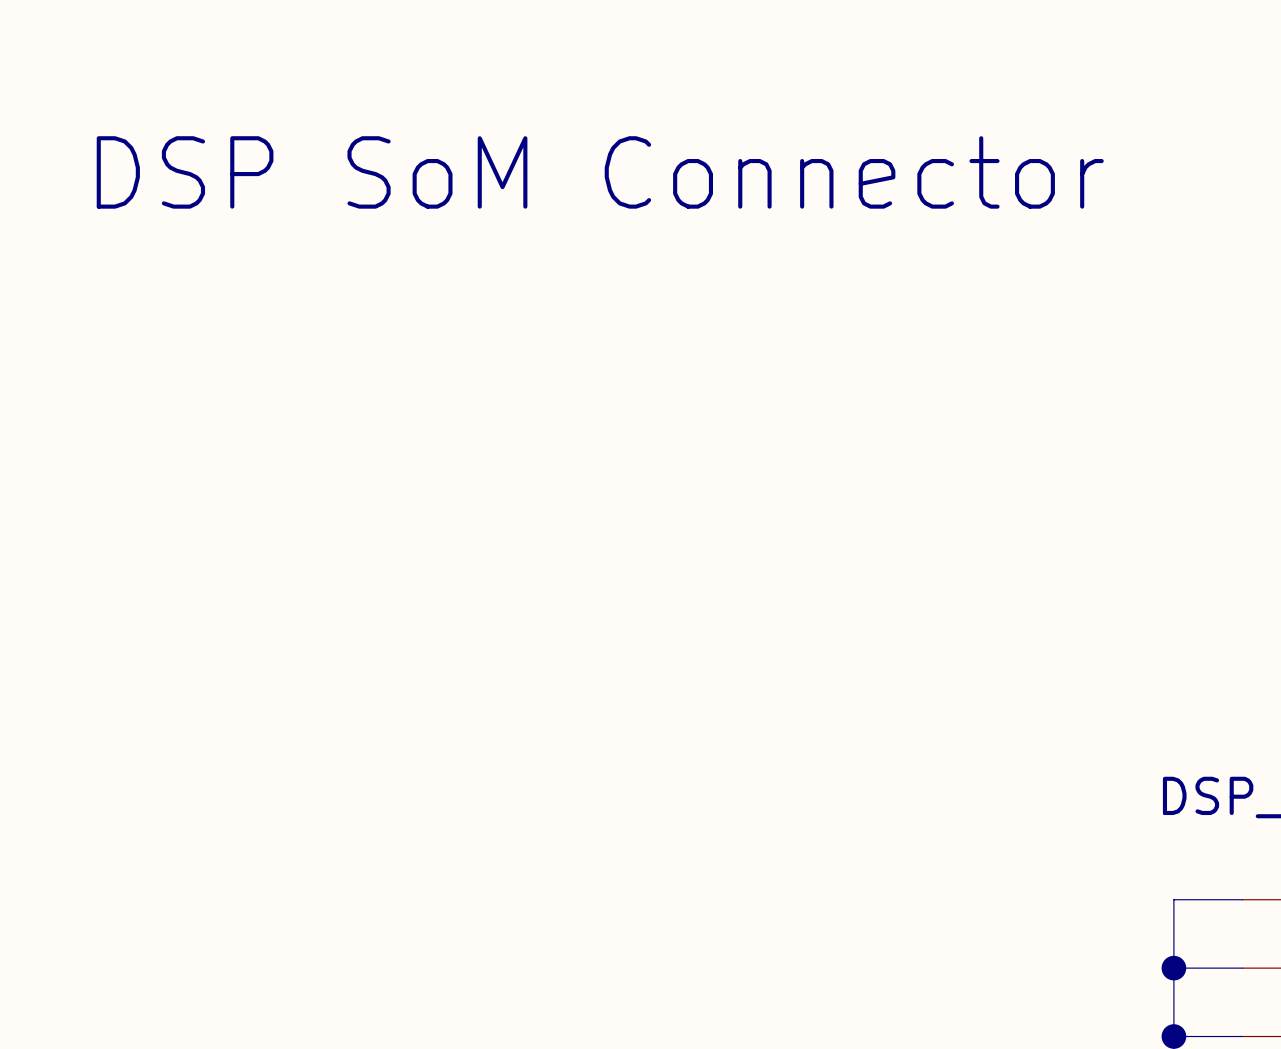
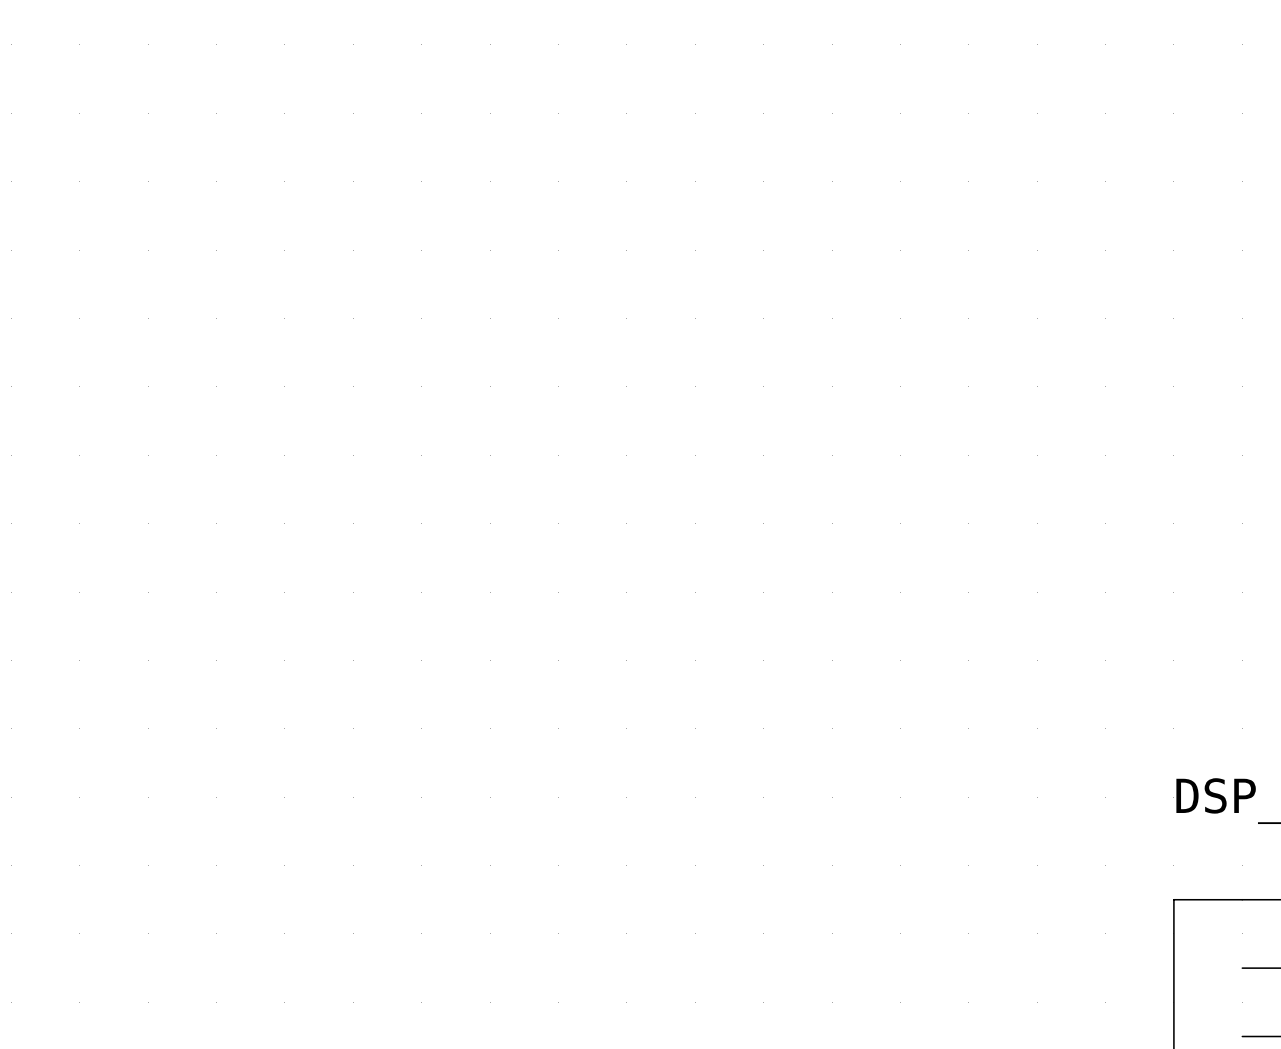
text: DSP SoM Connector (600, 172) -> none
wire: (1173, 968) (1242, 968) -> none
junction: (1173, 968) -> none
wire: (1173, 1036) (1242, 1036) -> none
junction: (1173, 1036) -> none

